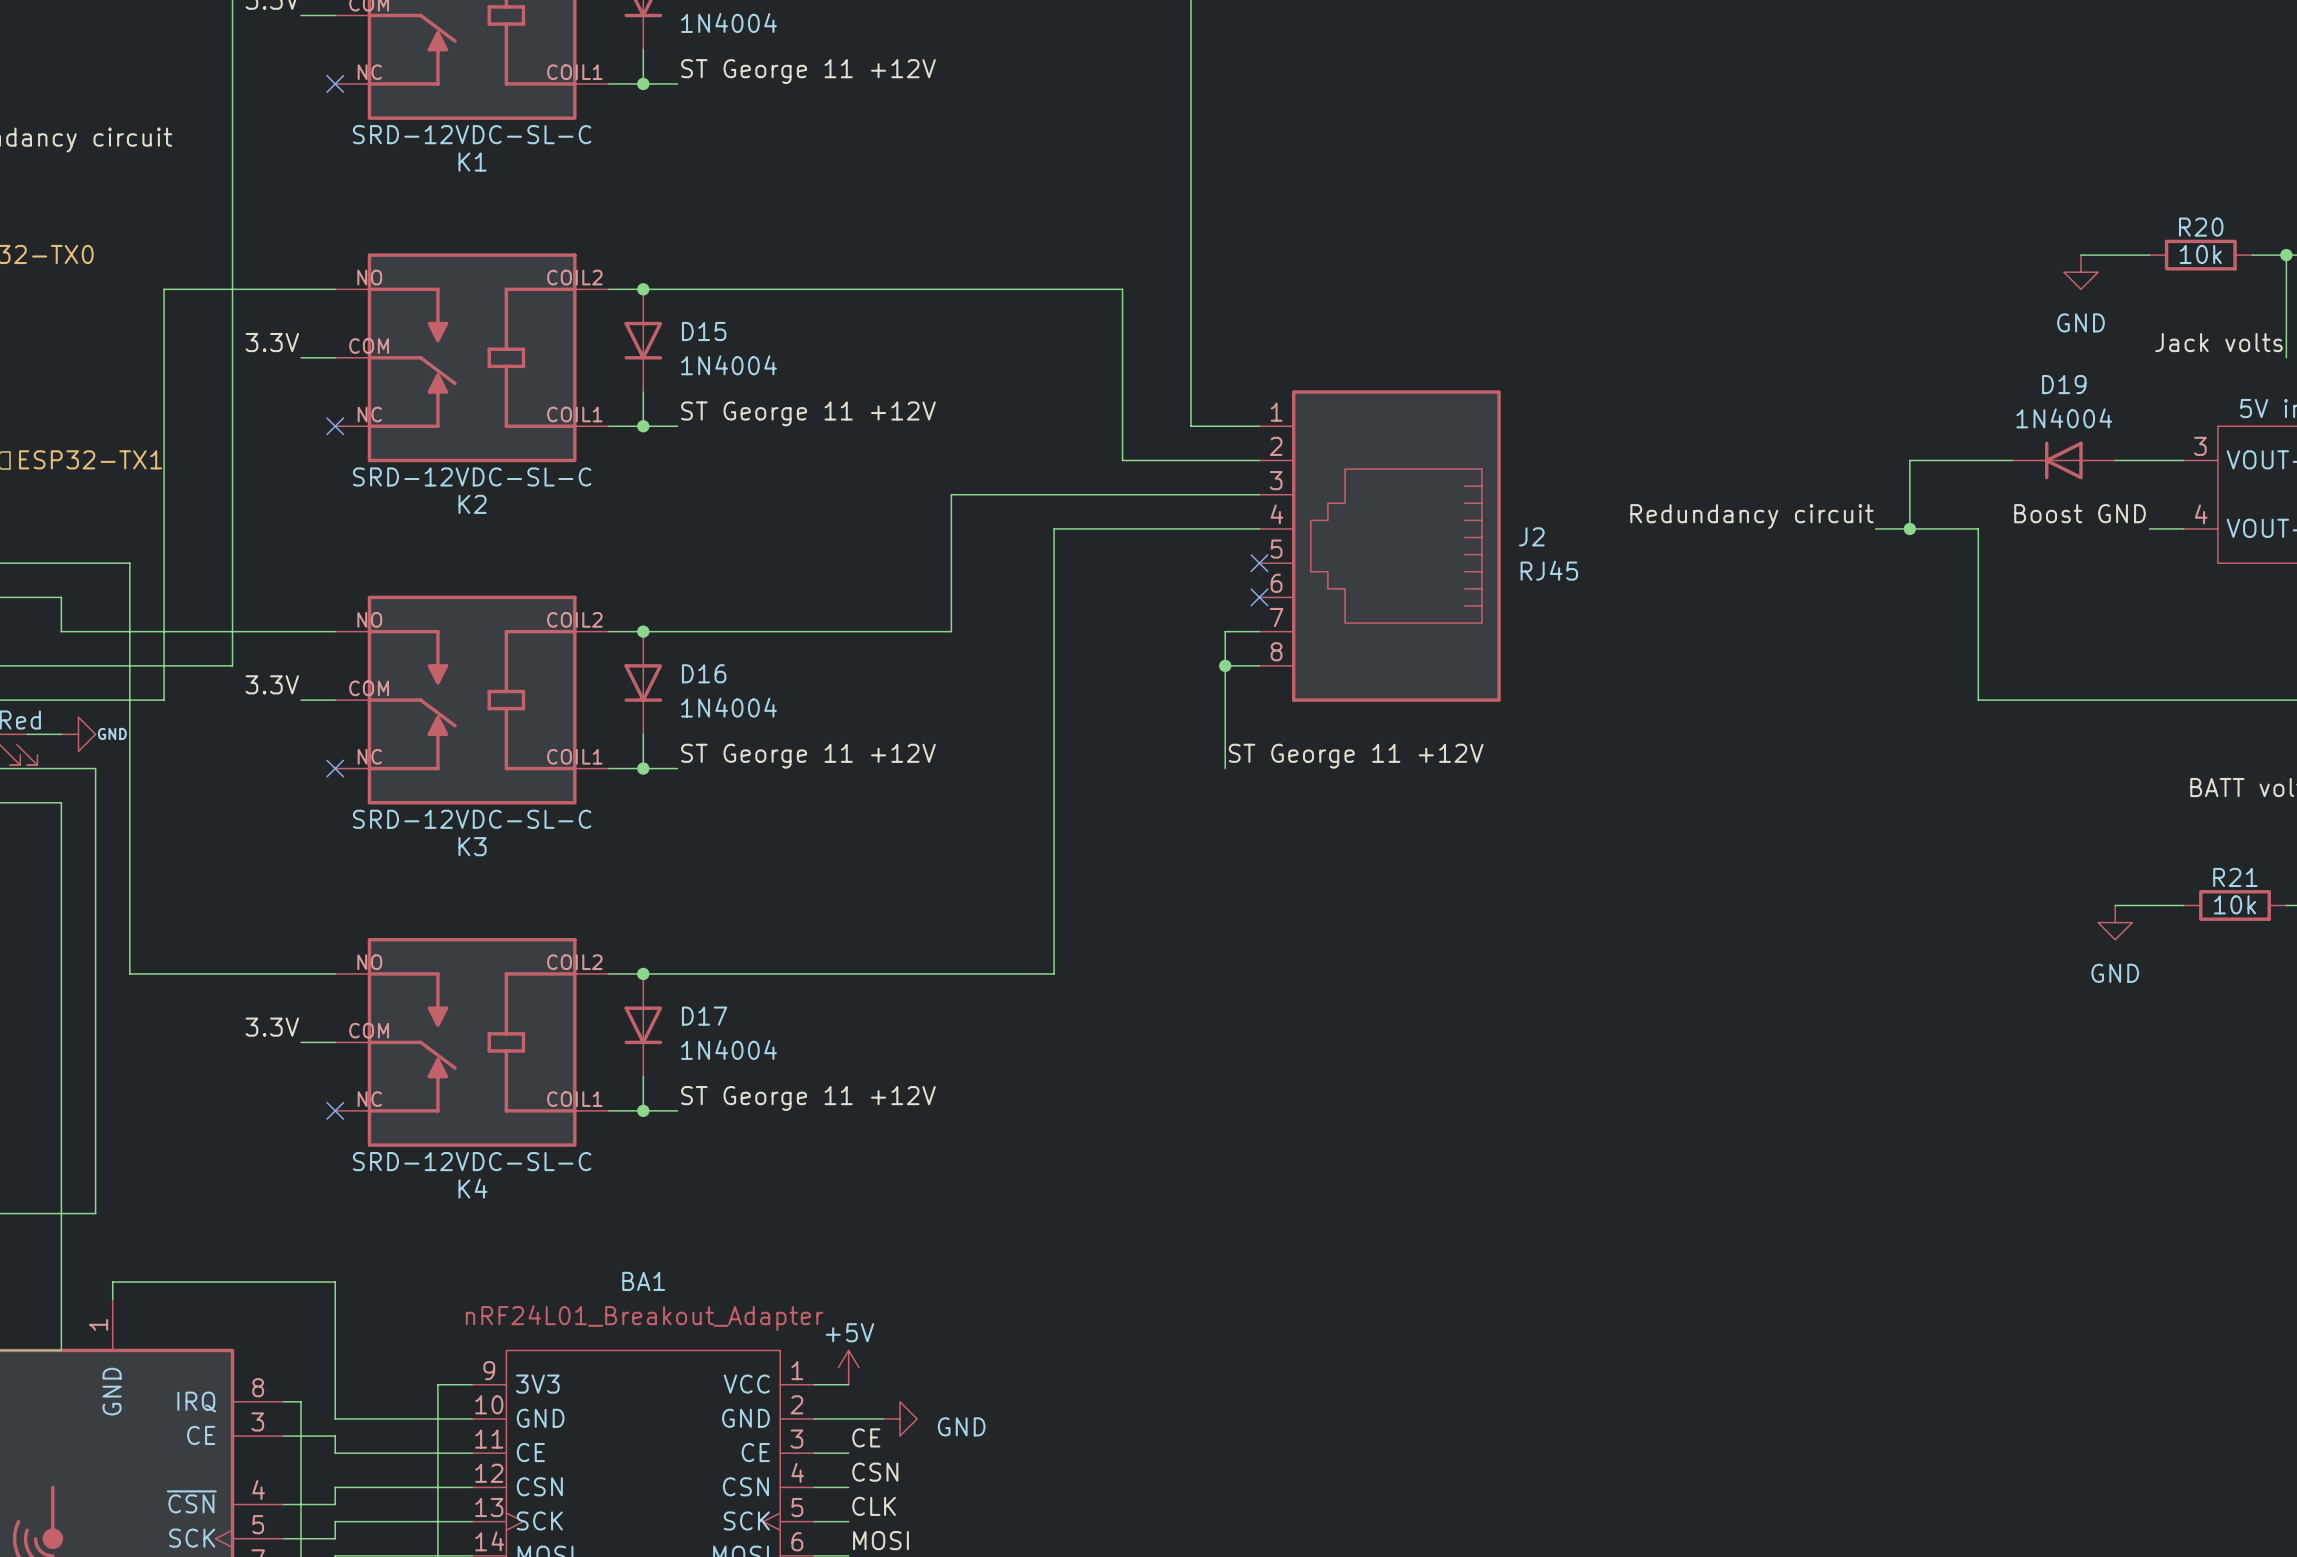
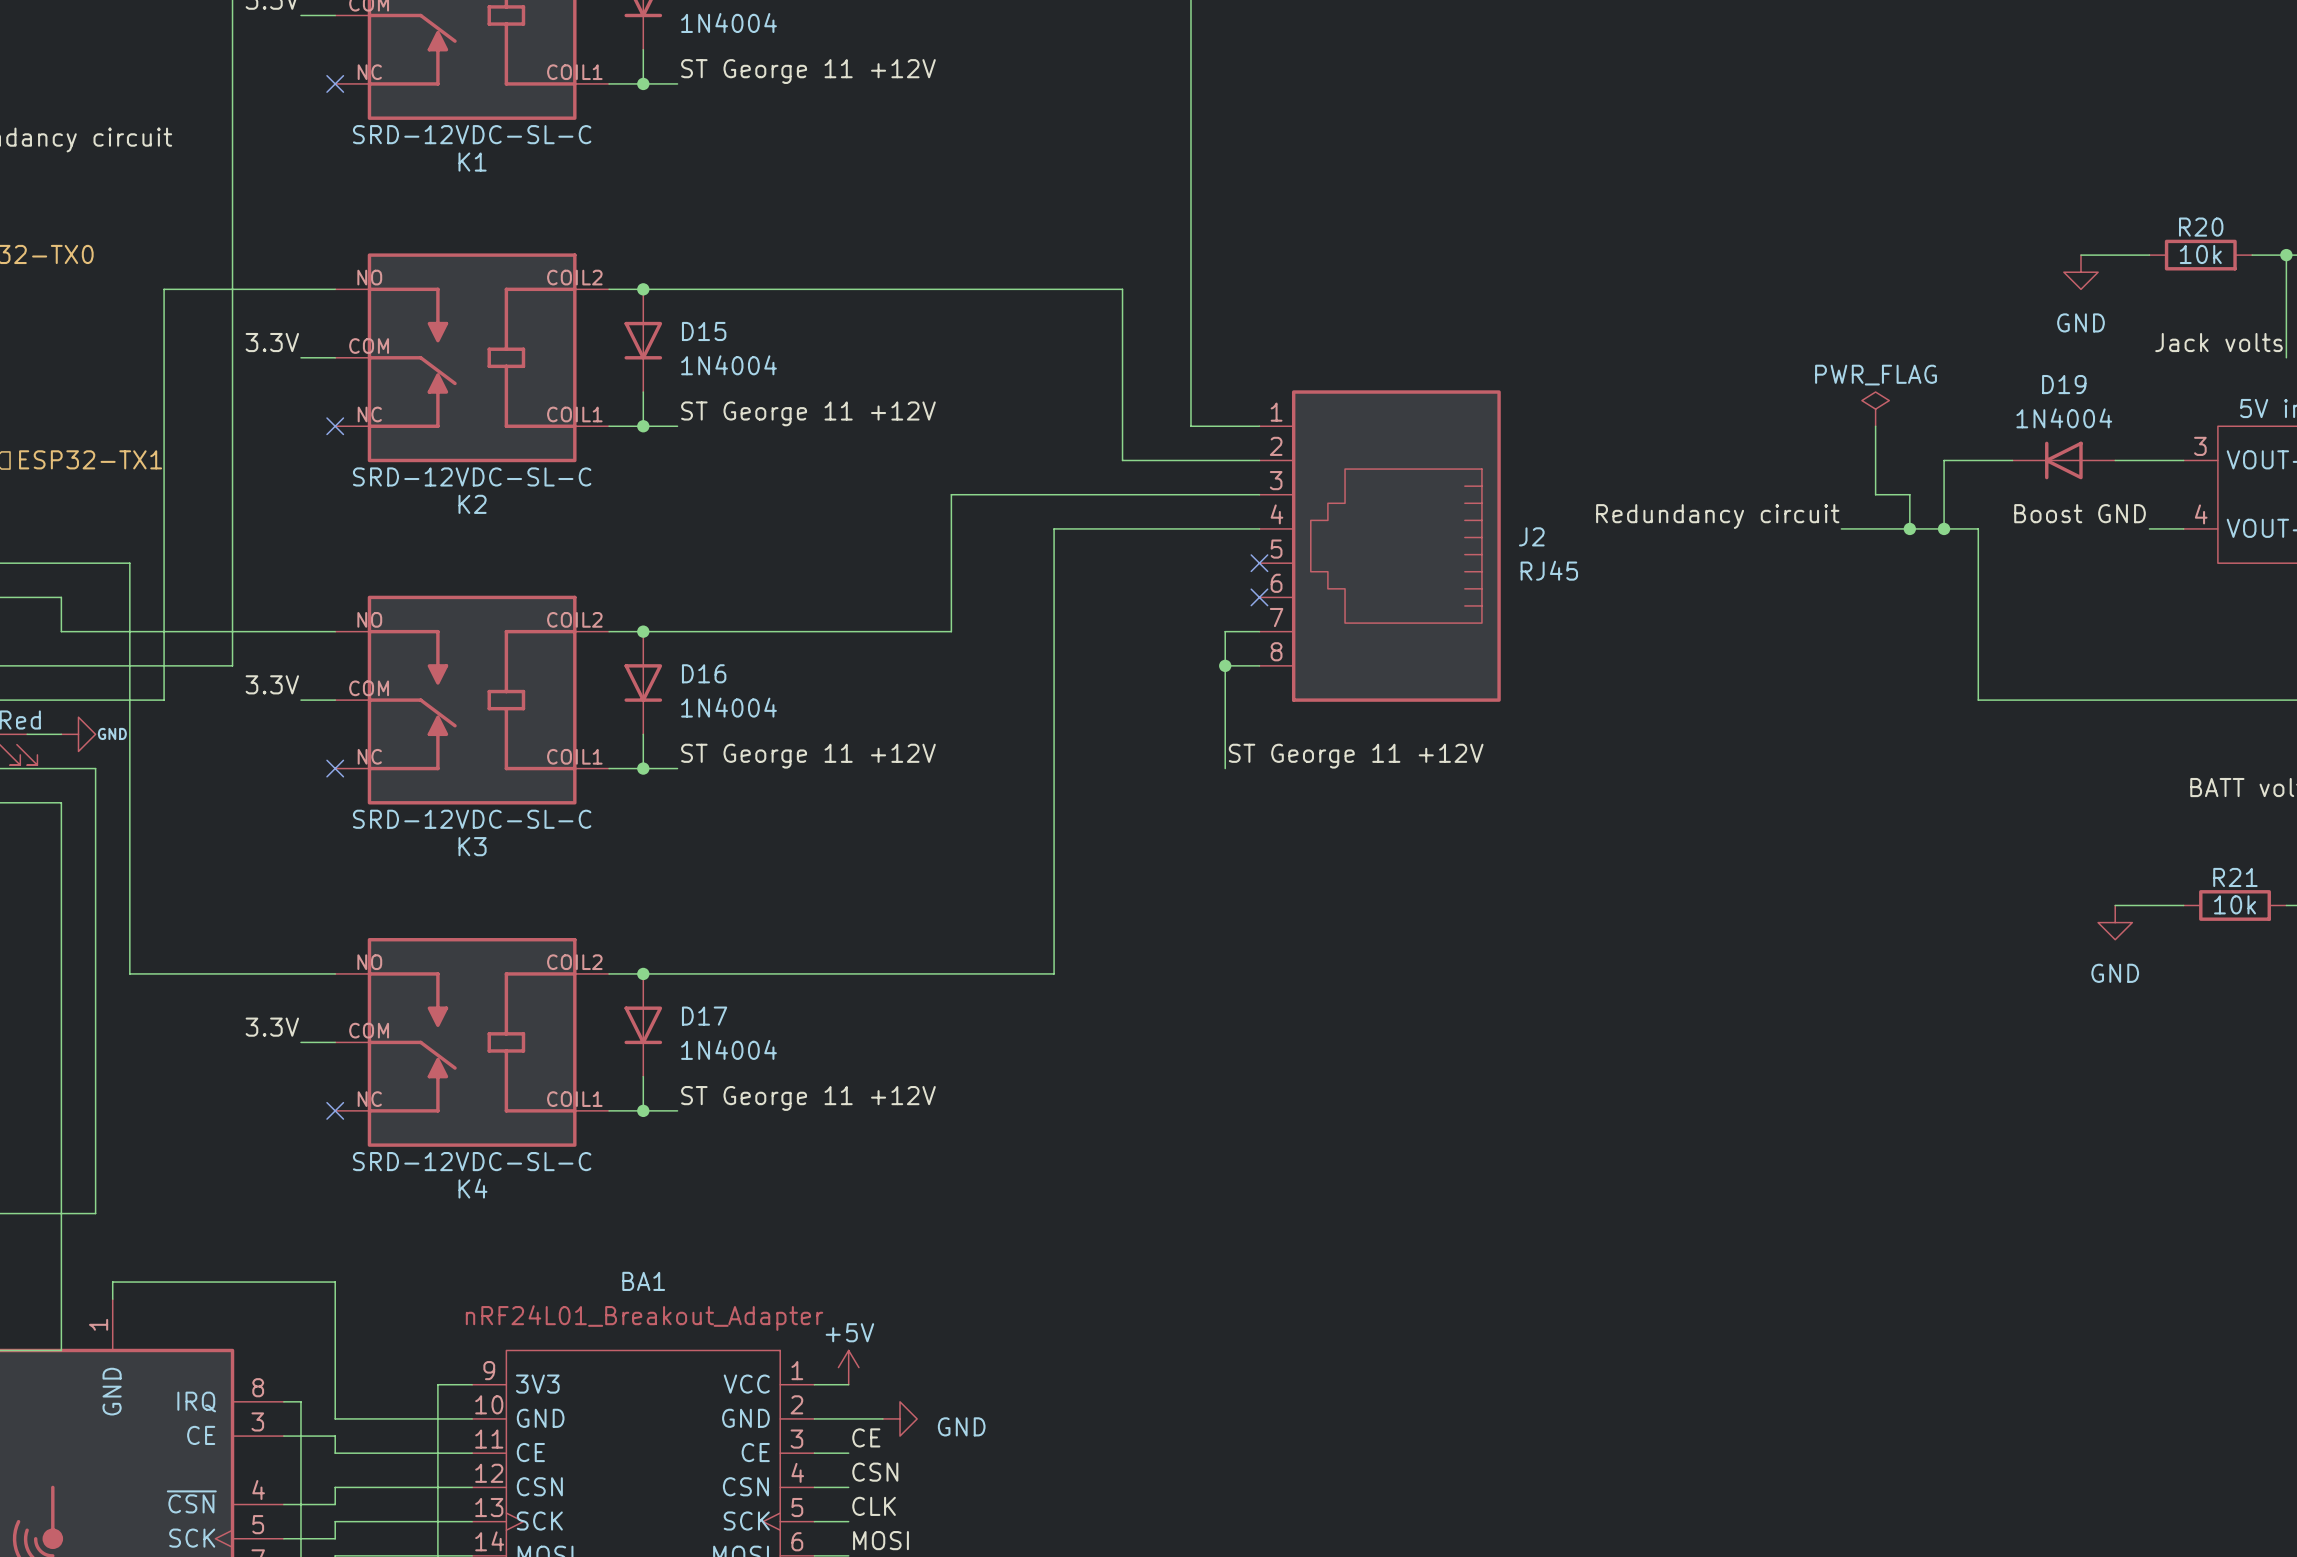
power symbol: none -> PWR_FLAG (1875, 409)
wire: none -> (1875, 426) (1875, 494) (1909, 494)
wire: (1944, 460) (1909, 460) (1909, 494) -> (1944, 460) (1944, 528)
label position: Redundancy circuit (1752, 516) -> Redundancy circuit (1717, 516)
wire: none -> (1841, 528) (1875, 528)
junction: none -> (1944, 528)

